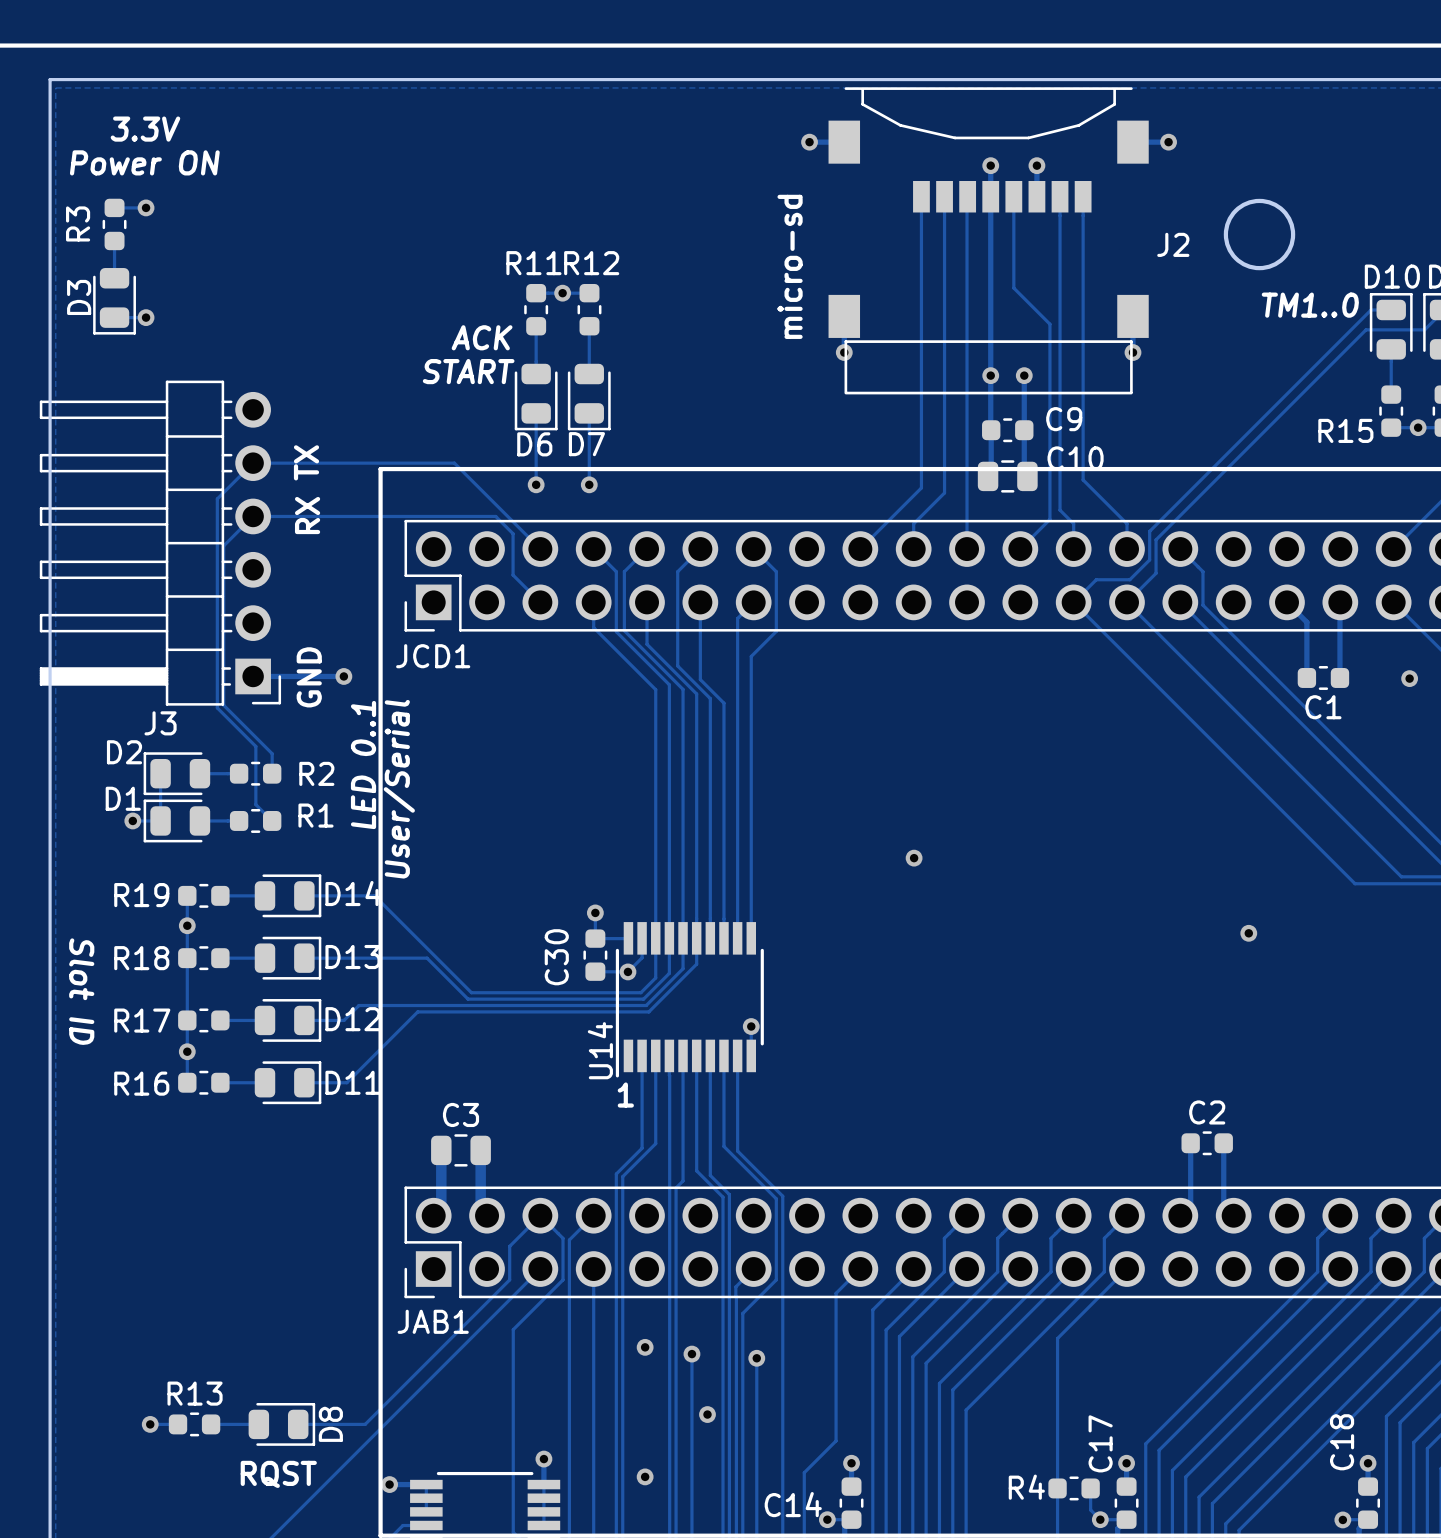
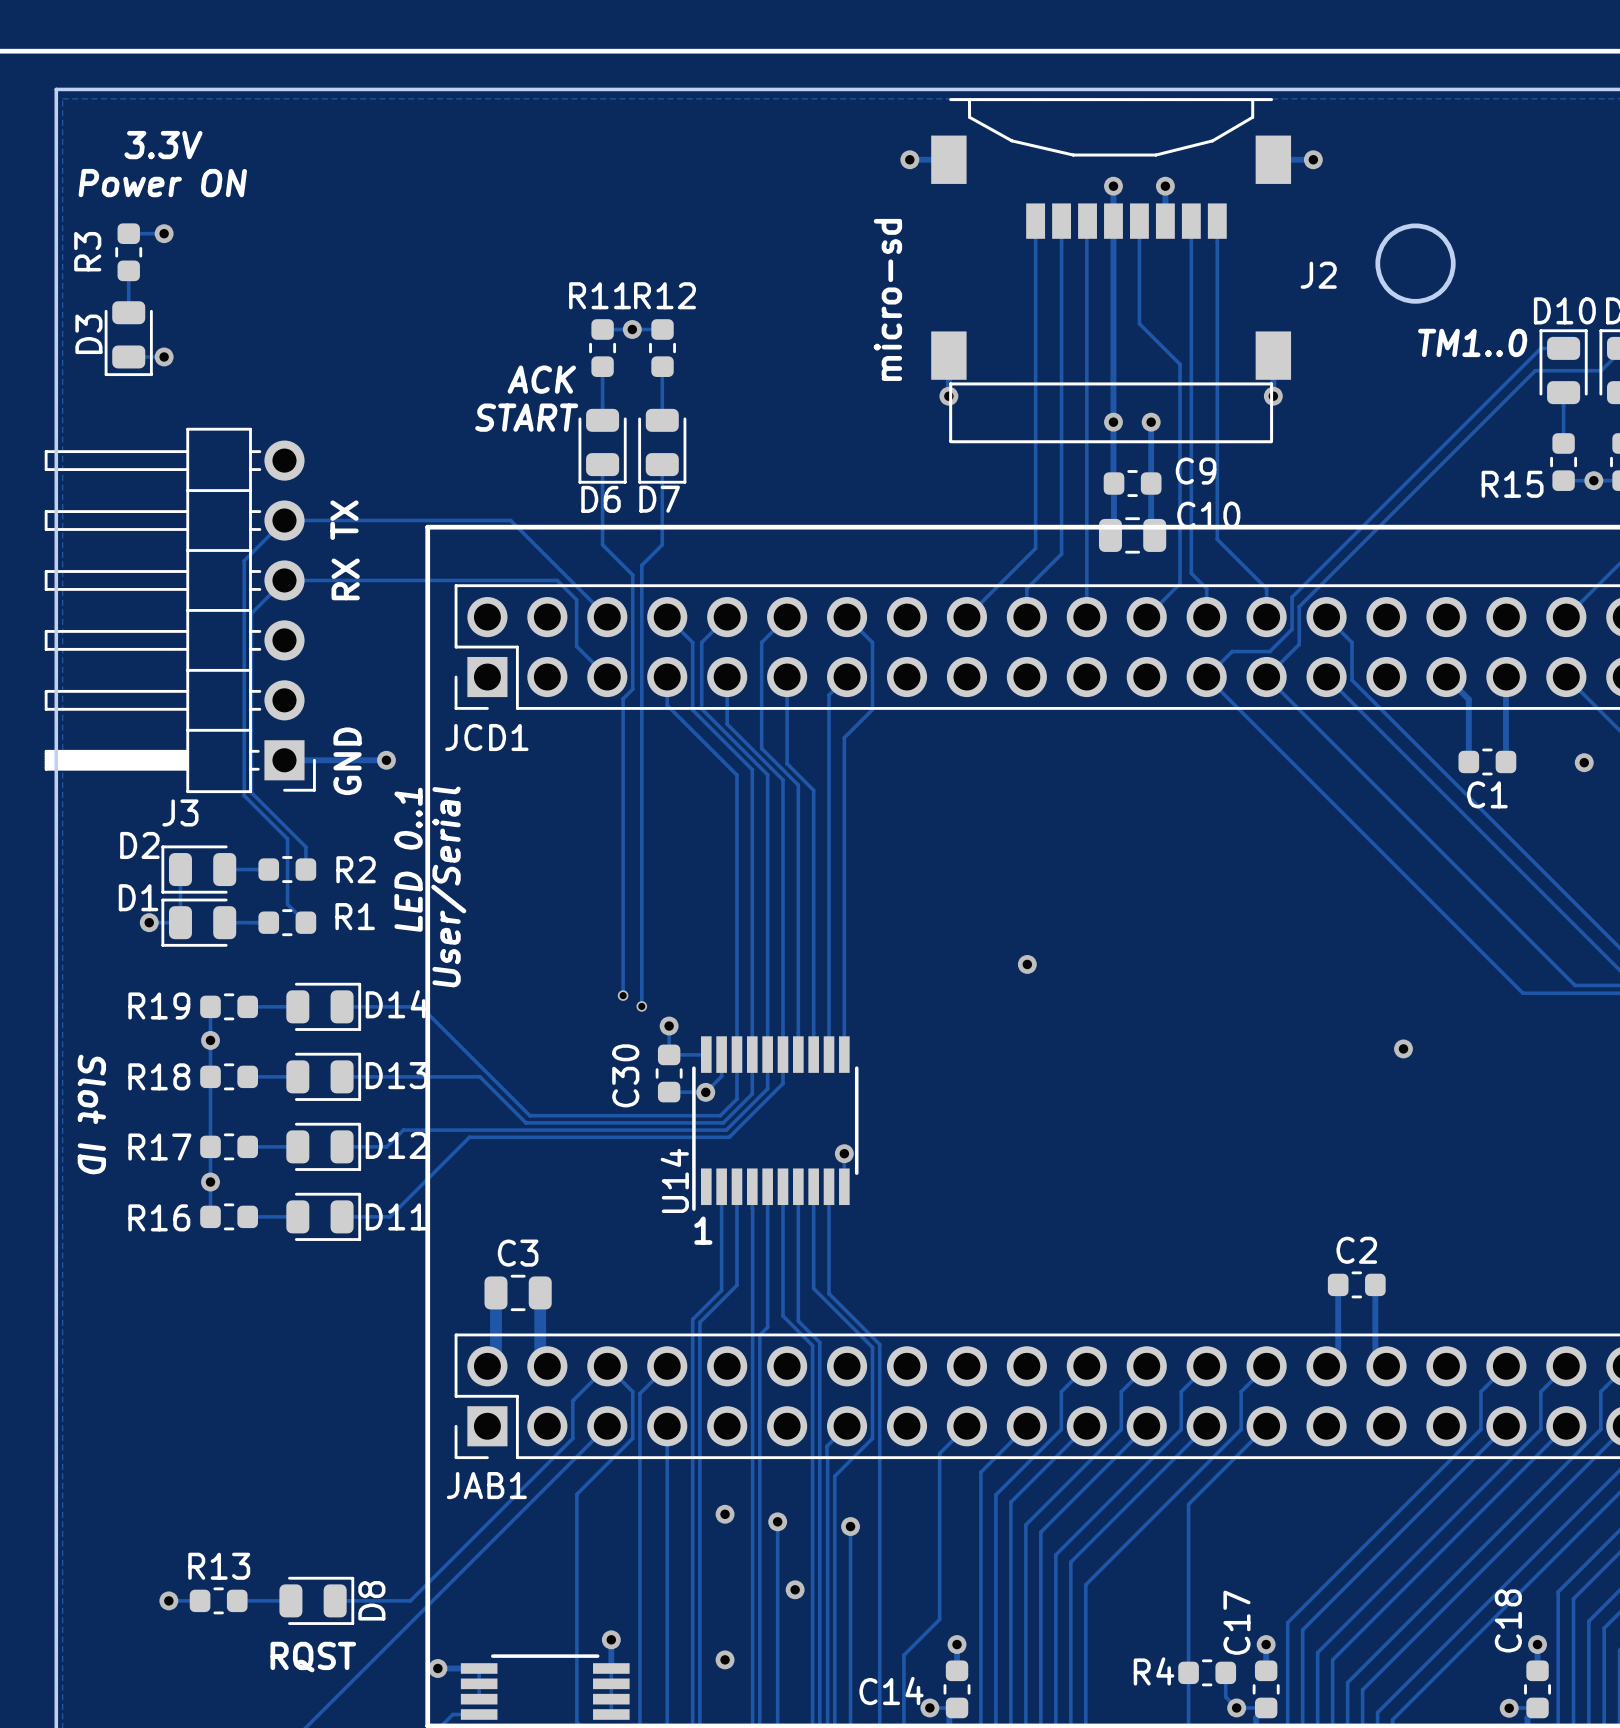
track: none -> (602, 544) (632, 575) (632, 689) (623, 698) (623, 995)
via: (536, 484) -> none
track: none -> (662, 544) (641, 565) (641, 1006)
via: (589, 484) -> none
via: none -> (623, 995)
via: none -> (641, 1006)

